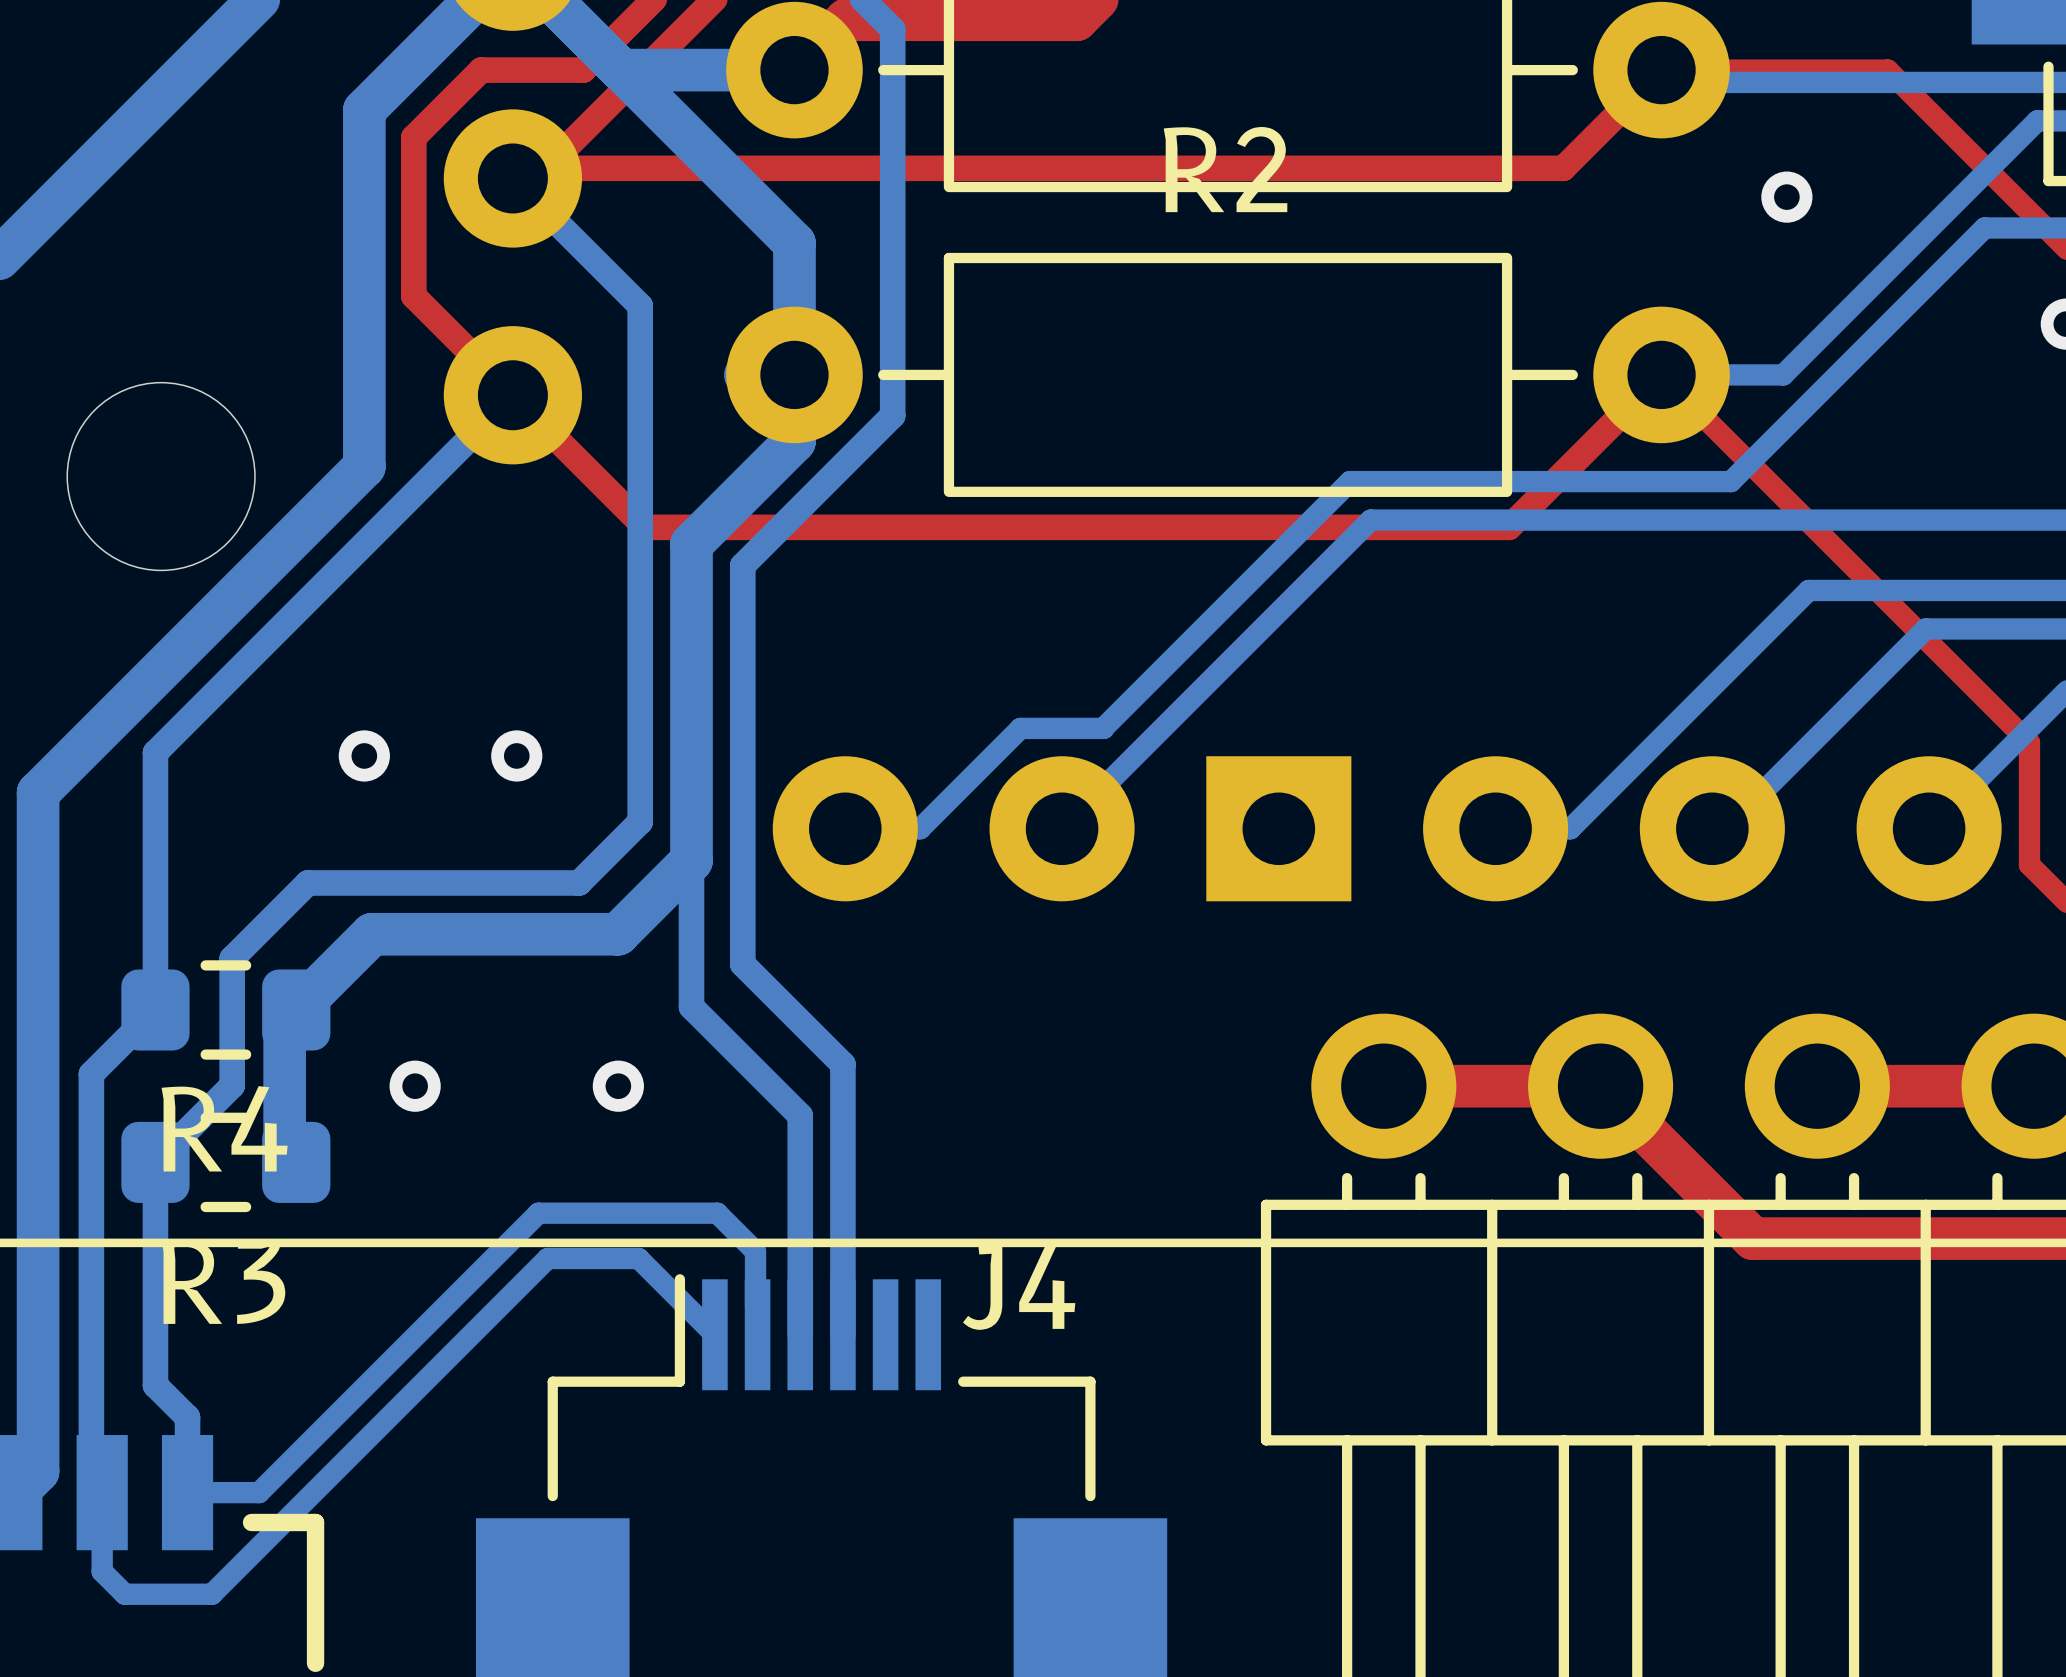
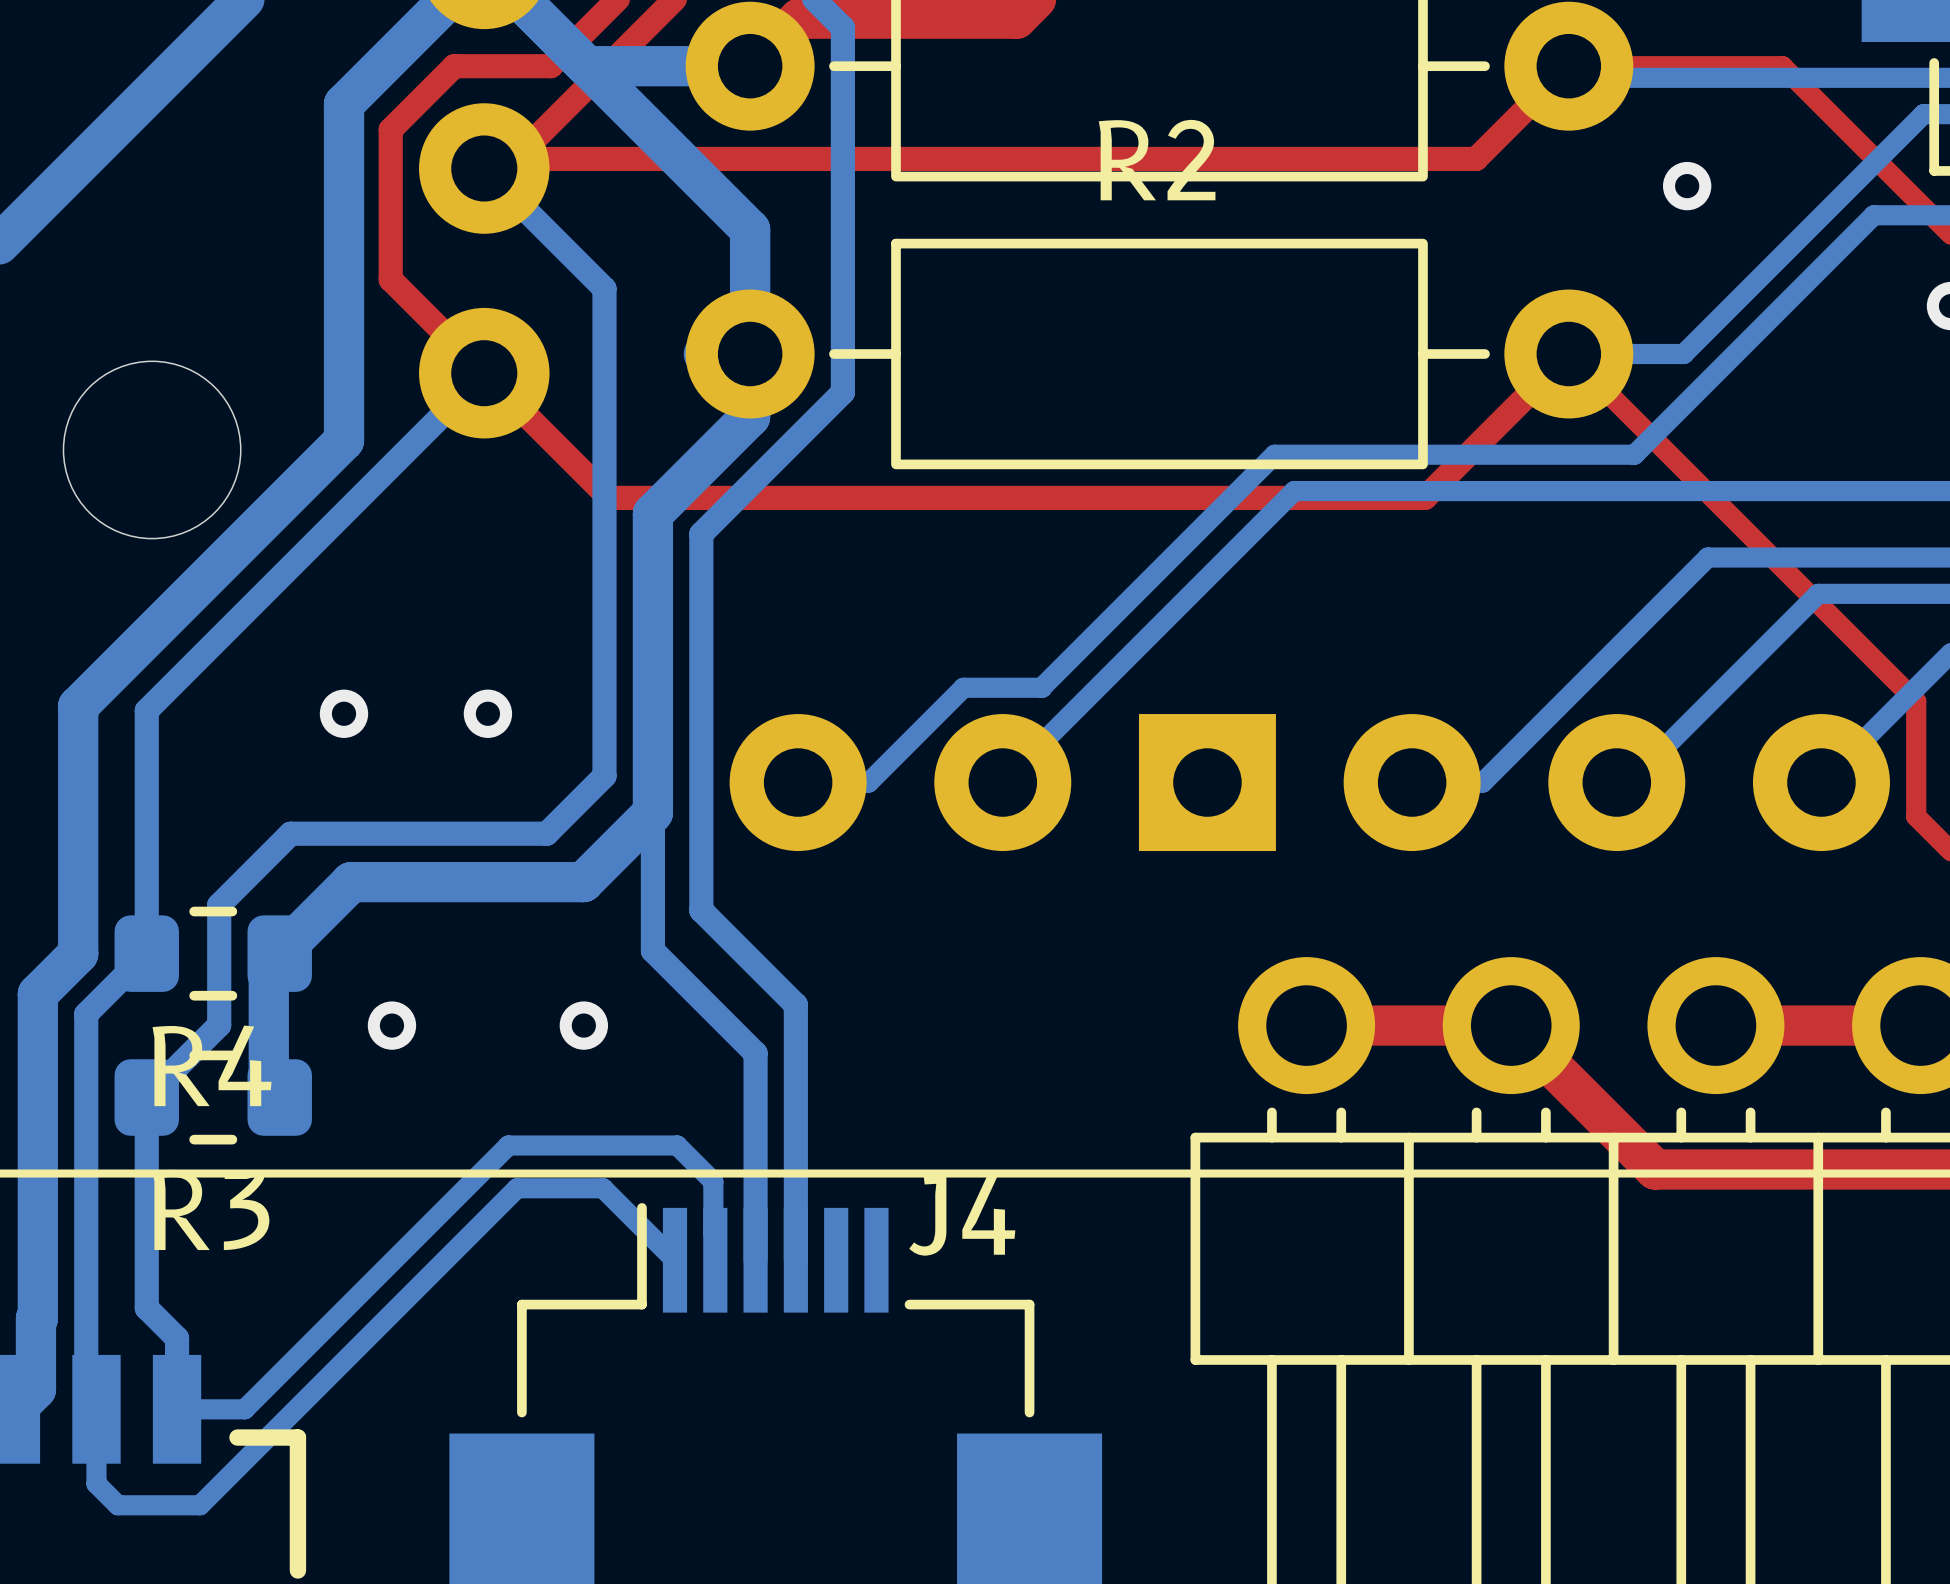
bottom track: (82, 748) (38, 792) (38, 1396) -> (78, 706) (78, 953) (37, 994) (37, 1318) (35, 1318)

